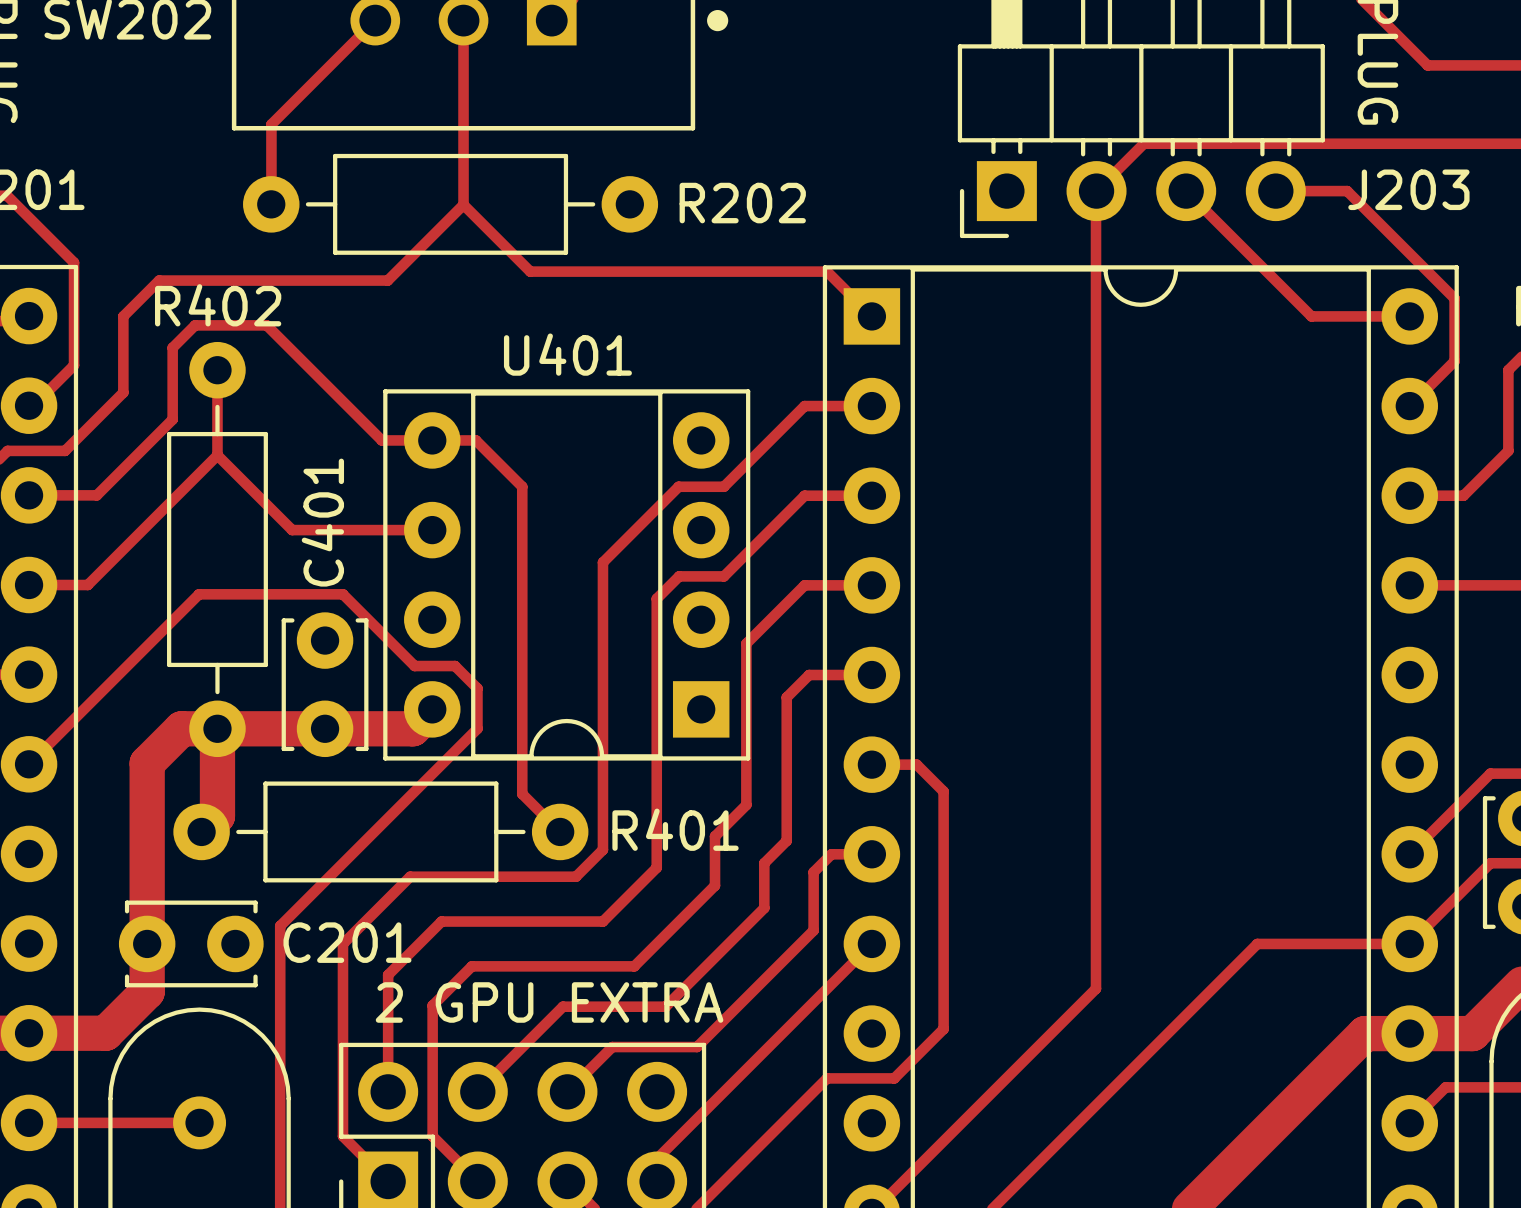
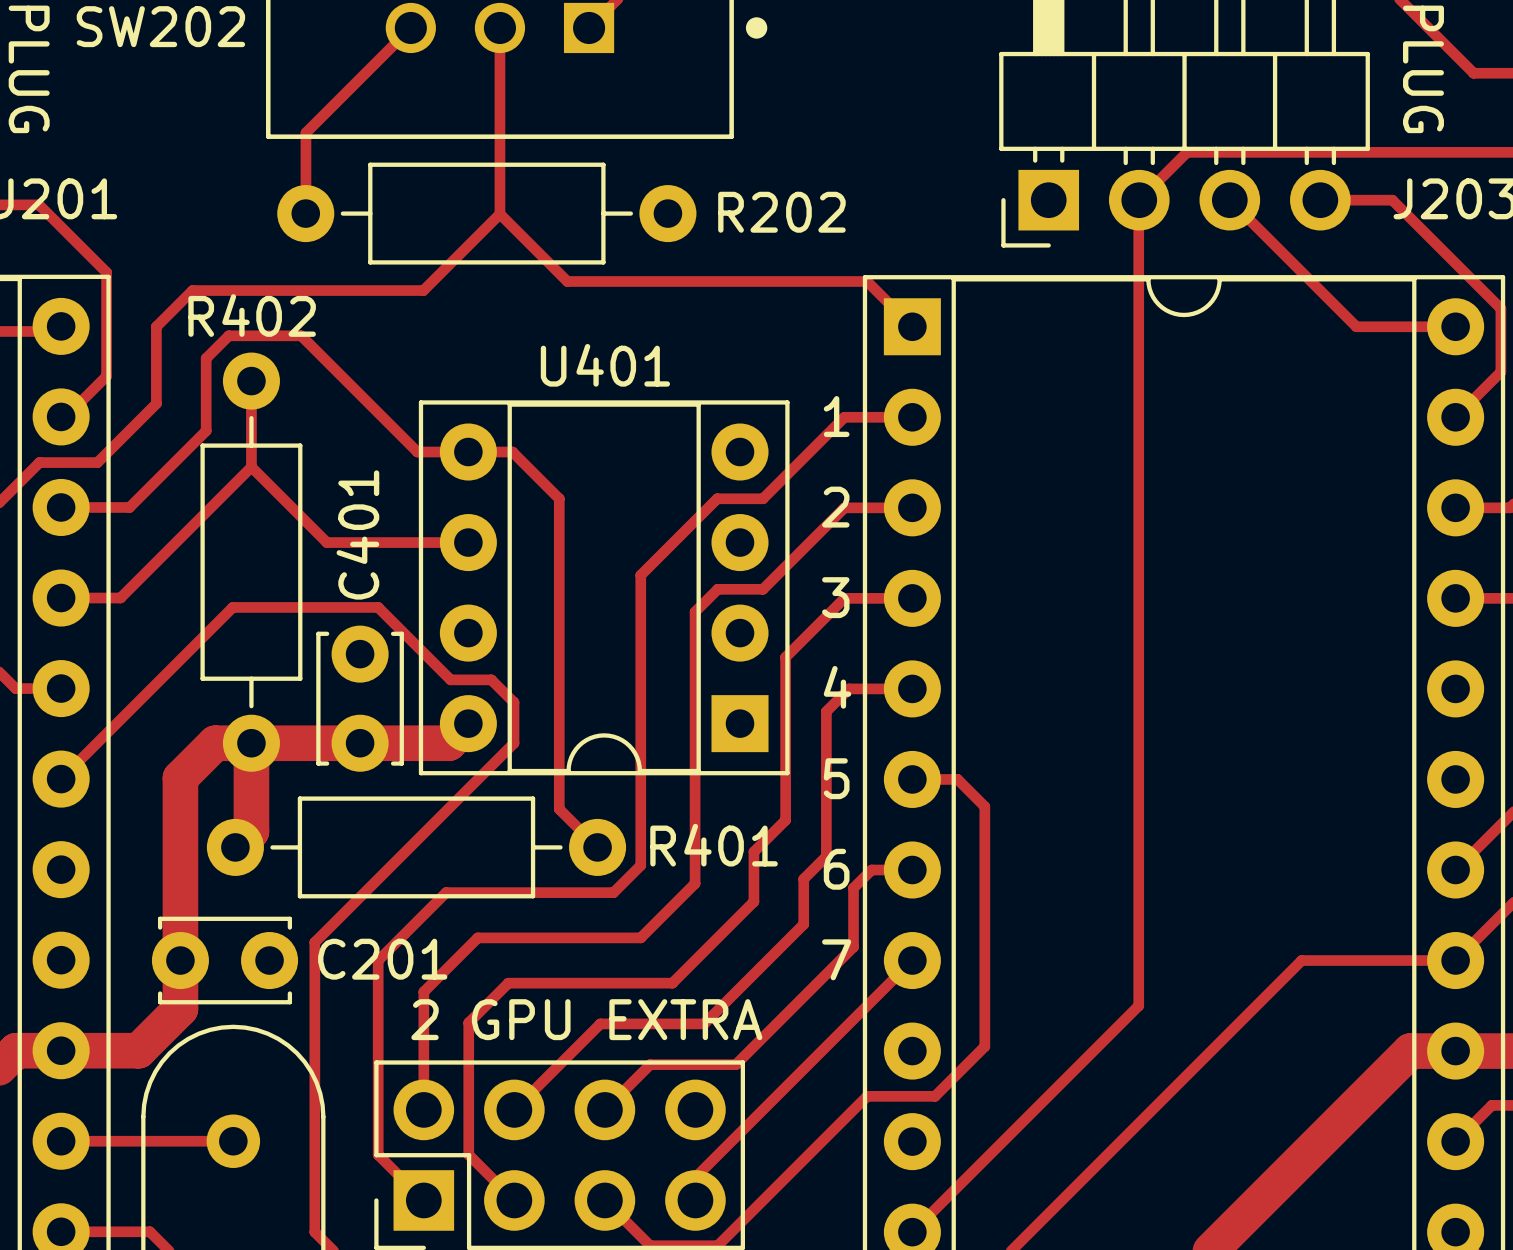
text: none -> 1 (836, 416)
text: none -> 2 (835, 507)
text: none -> 3 (835, 597)
text: none -> 4 (837, 687)
text: none -> 5 (836, 778)
text: none -> 6 (836, 869)
text: none -> 7 (836, 959)

